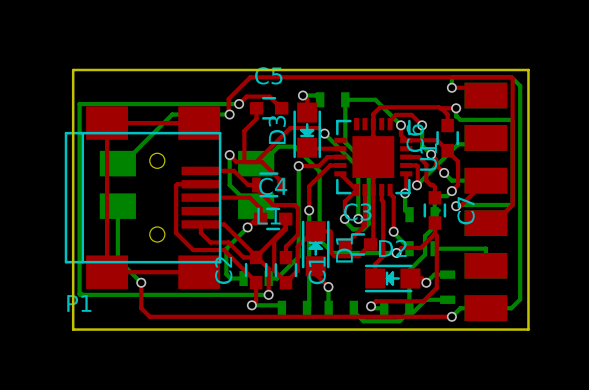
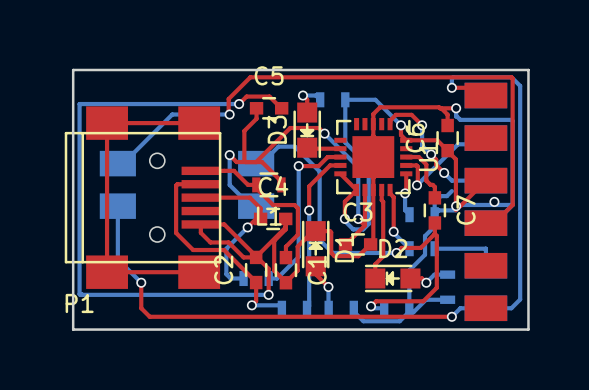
top track: (455, 159) (458, 161) (458, 184) (451, 191) -> (455, 159) (455, 210)
via position: (451, 191) -> (494, 201)
bottom track: none -> (438, 210) (456, 210)

